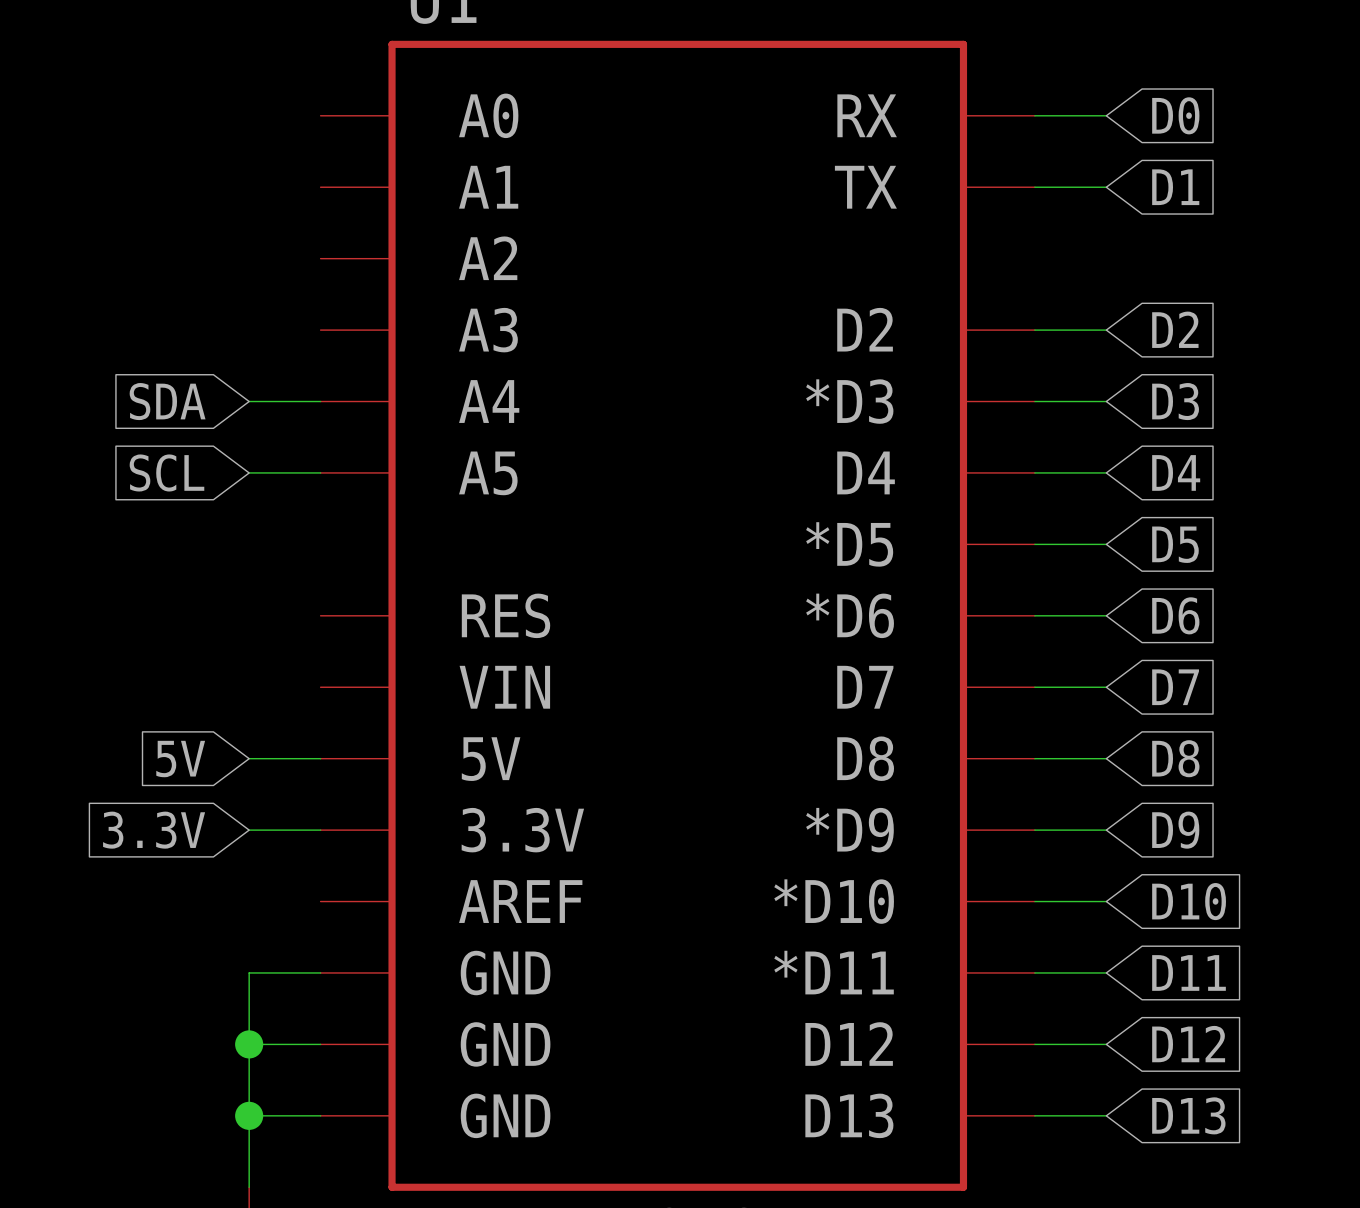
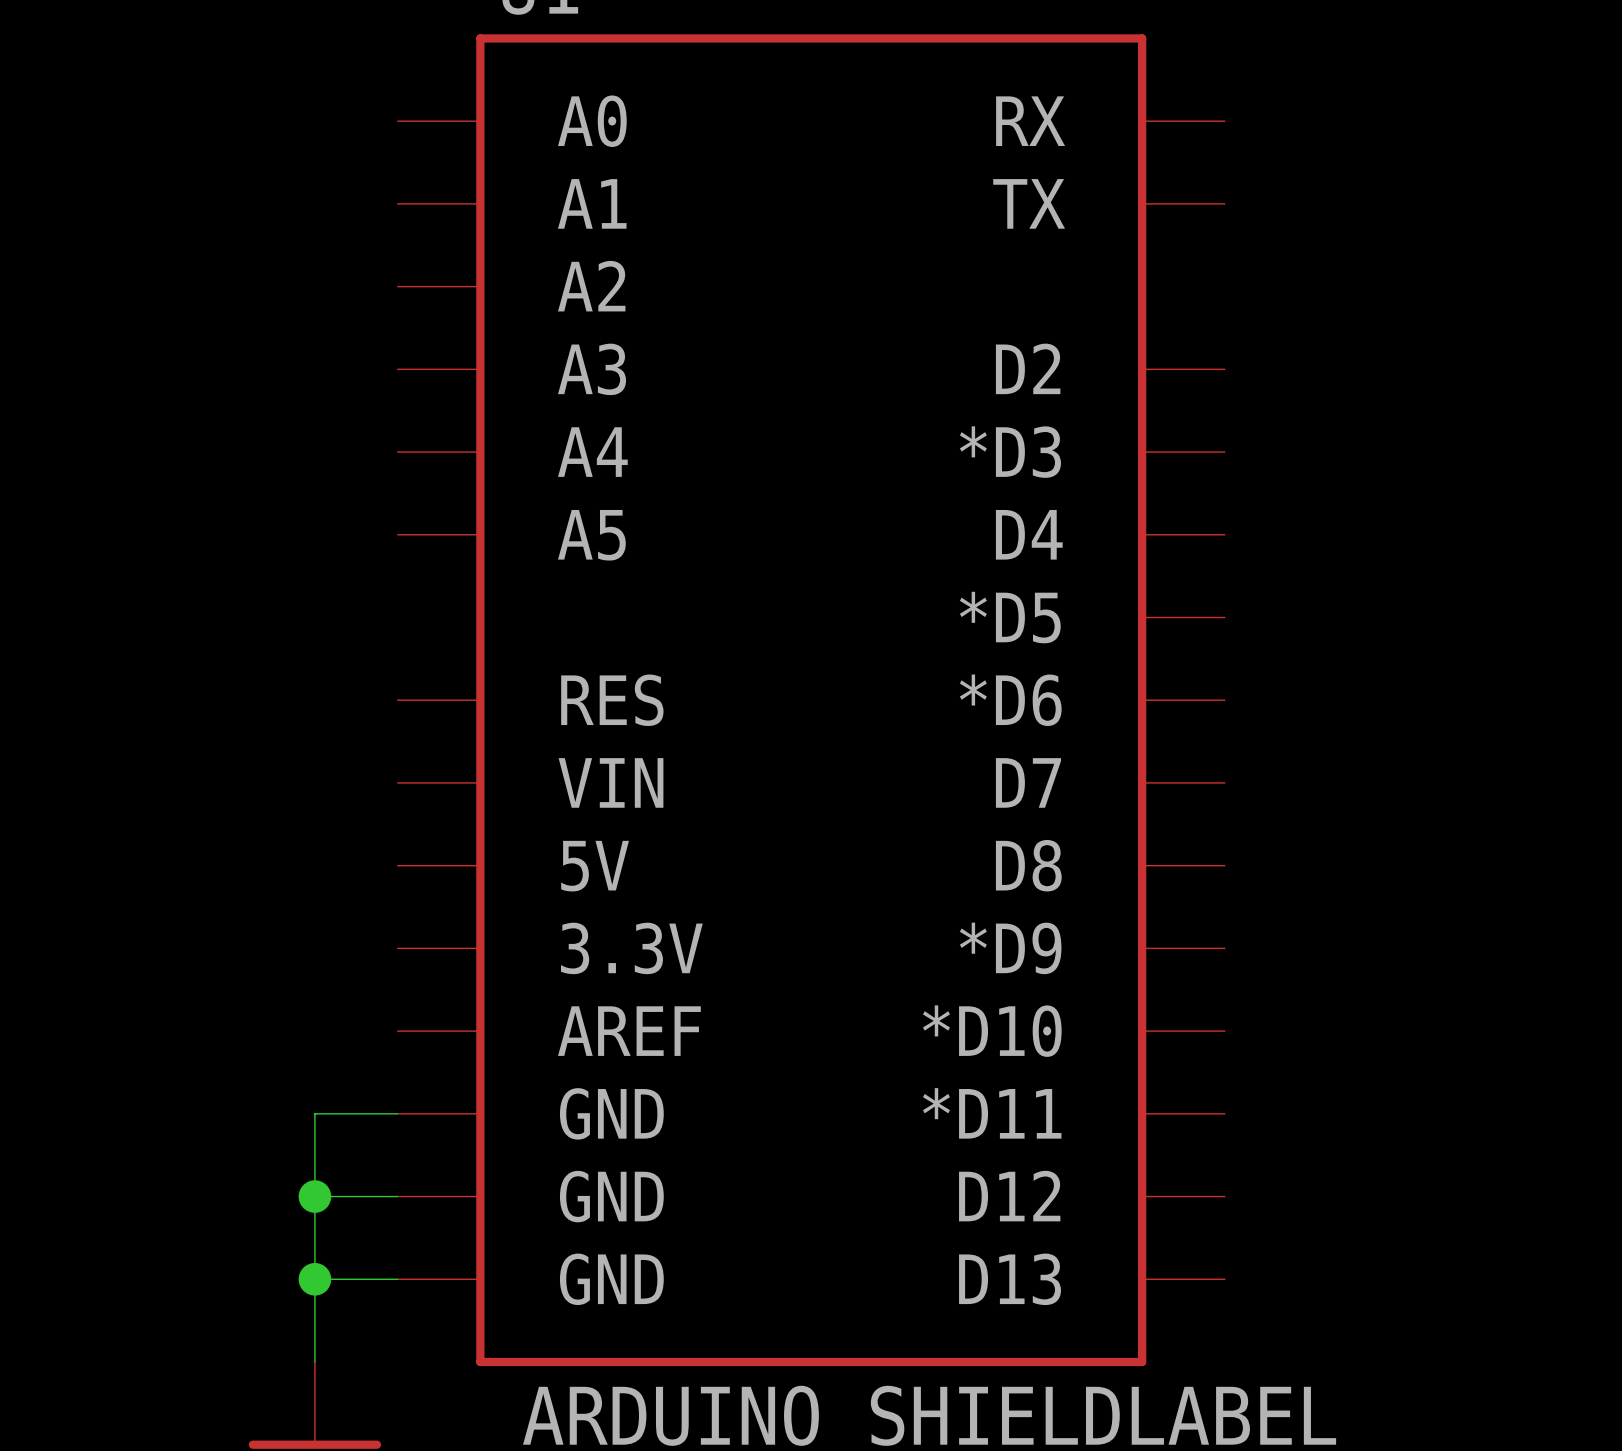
wire: (1034, 115) (1106, 115) -> none
global label: D0 (1175, 115) -> none
wire: (1034, 187) (1106, 187) -> none
global label: D1 (1175, 187) -> none
global label: D2 (1175, 329) -> none
wire: (1034, 330) (1106, 330) -> none
global label: SDA (167, 401) -> none
wire: (249, 401) (320, 401) -> none
wire: (1034, 401) (1106, 401) -> none
global label: D3 (1175, 401) -> none
global label: SCL (166, 472) -> none
wire: (249, 472) (320, 472) -> none
wire: (1034, 472) (1106, 472) -> none
global label: D4 (1176, 472) -> none
wire: (1034, 544) (1106, 544) -> none
global label: D5 (1175, 544) -> none
wire: (1034, 615) (1106, 615) -> none
global label: D6 (1175, 615) -> none
wire: (1034, 687) (1106, 687) -> none
global label: D7 (1175, 687) -> none
wire: (249, 758) (320, 758) -> none
wire: (1034, 758) (1106, 758) -> none
global label: D8 (1175, 758) -> none
global label: 5V (180, 759) -> none
global label: 3.3V (154, 830) -> none
wire: (249, 830) (320, 830) -> none
wire: (1034, 830) (1106, 830) -> none
global label: D9 (1175, 830) -> none
wire: (1034, 901) (1106, 901) -> none
global label: D10 (1189, 901) -> none
wire: (1034, 972) (1106, 972) -> none
global label: D11 (1189, 972) -> none
wire: (1034, 1044) (1106, 1044) -> none
global label: D12 (1188, 1044) -> none
wire: (1034, 1115) (1106, 1115) -> none
global label: D13 (1188, 1115) -> none

